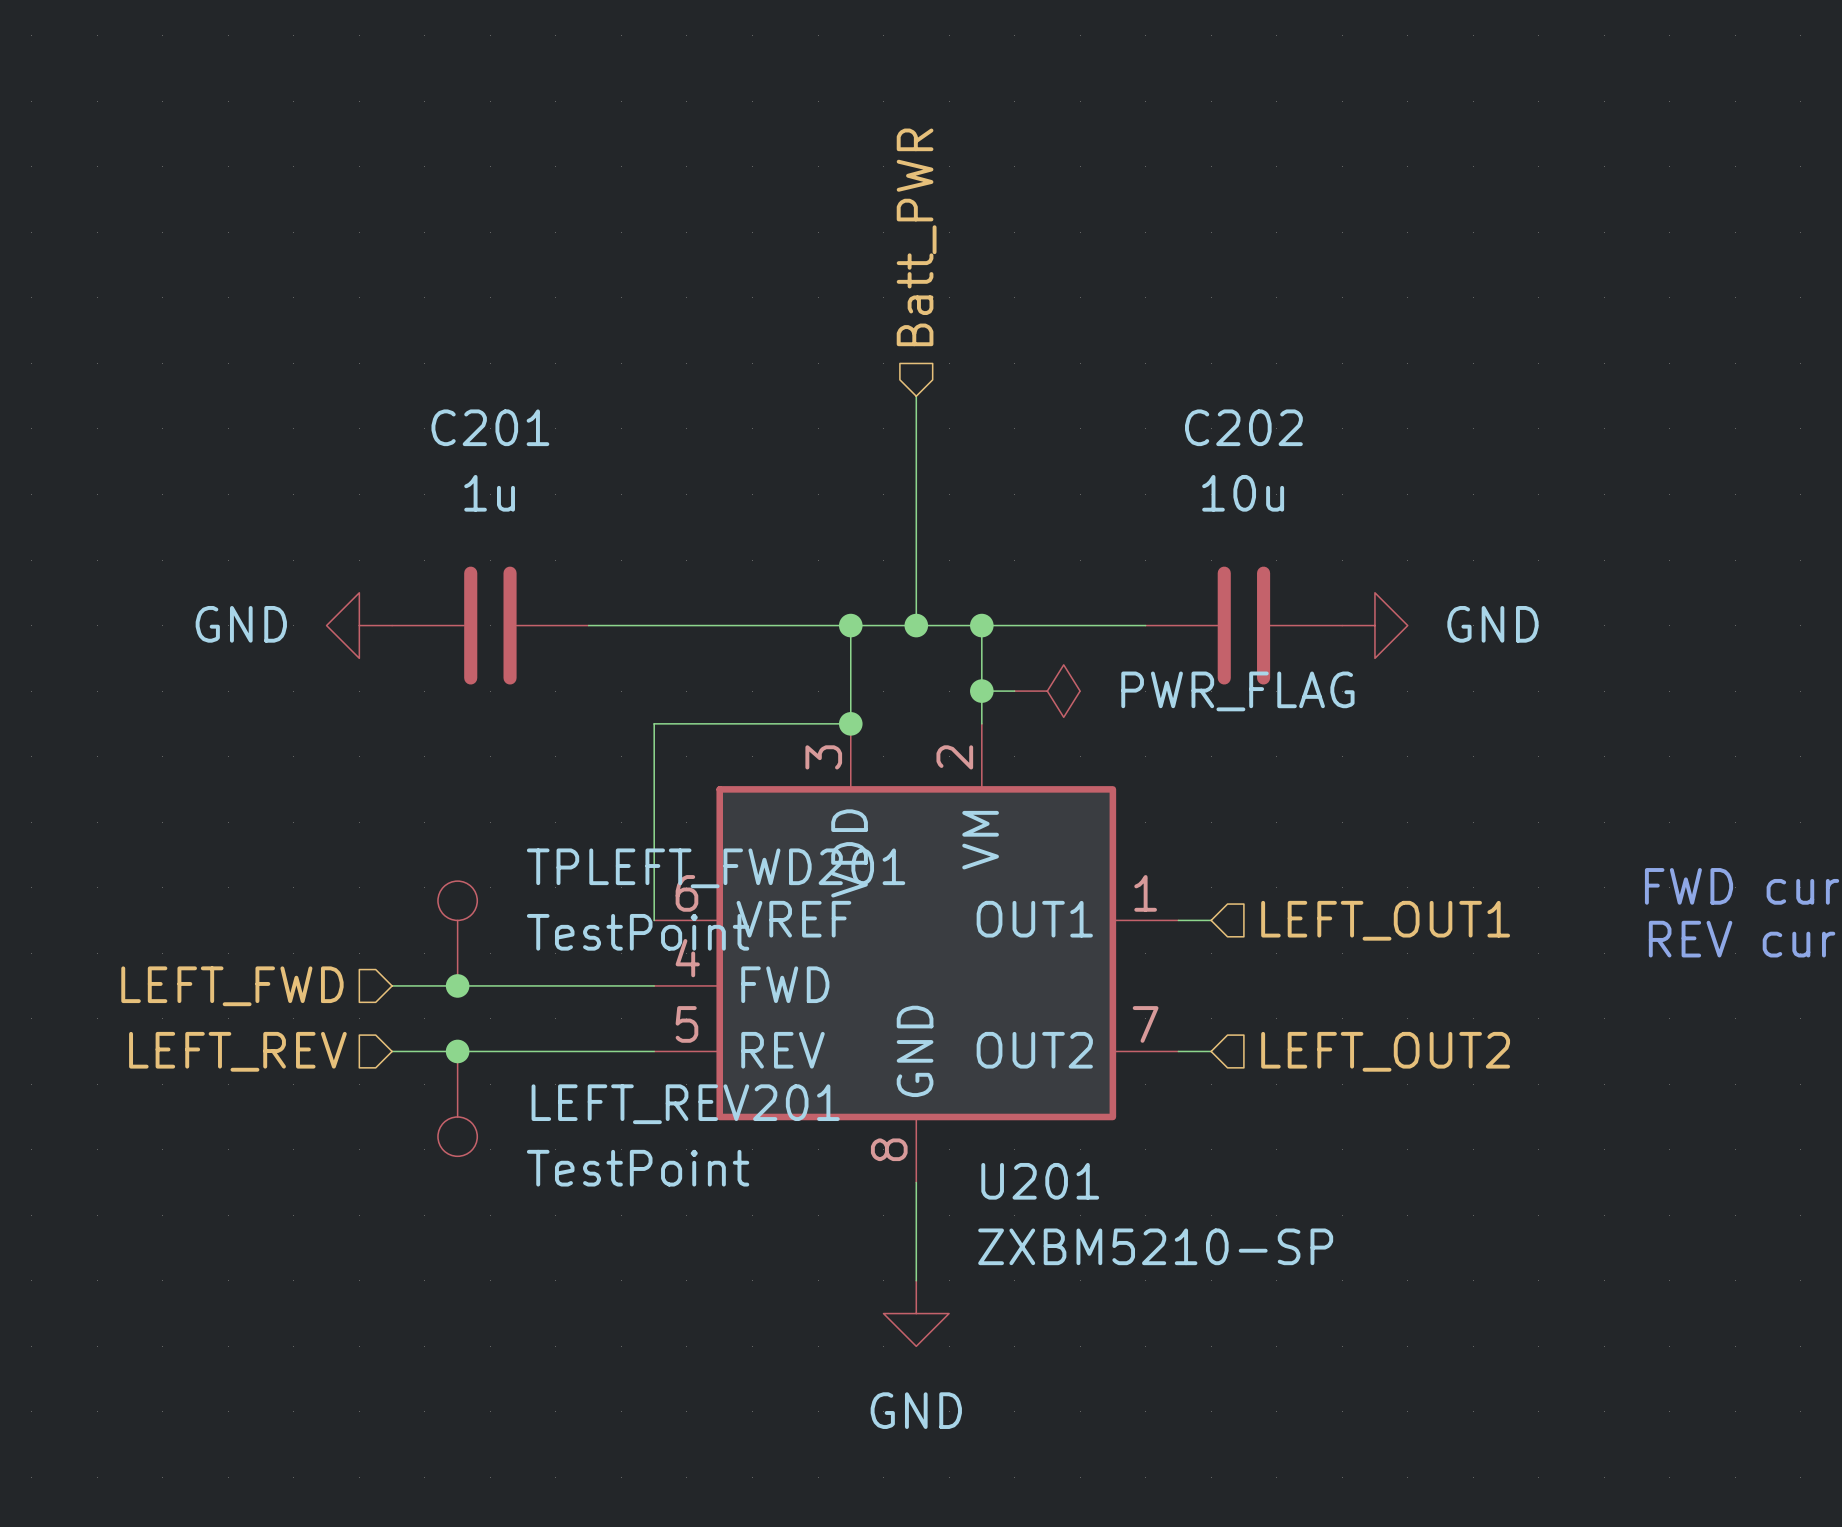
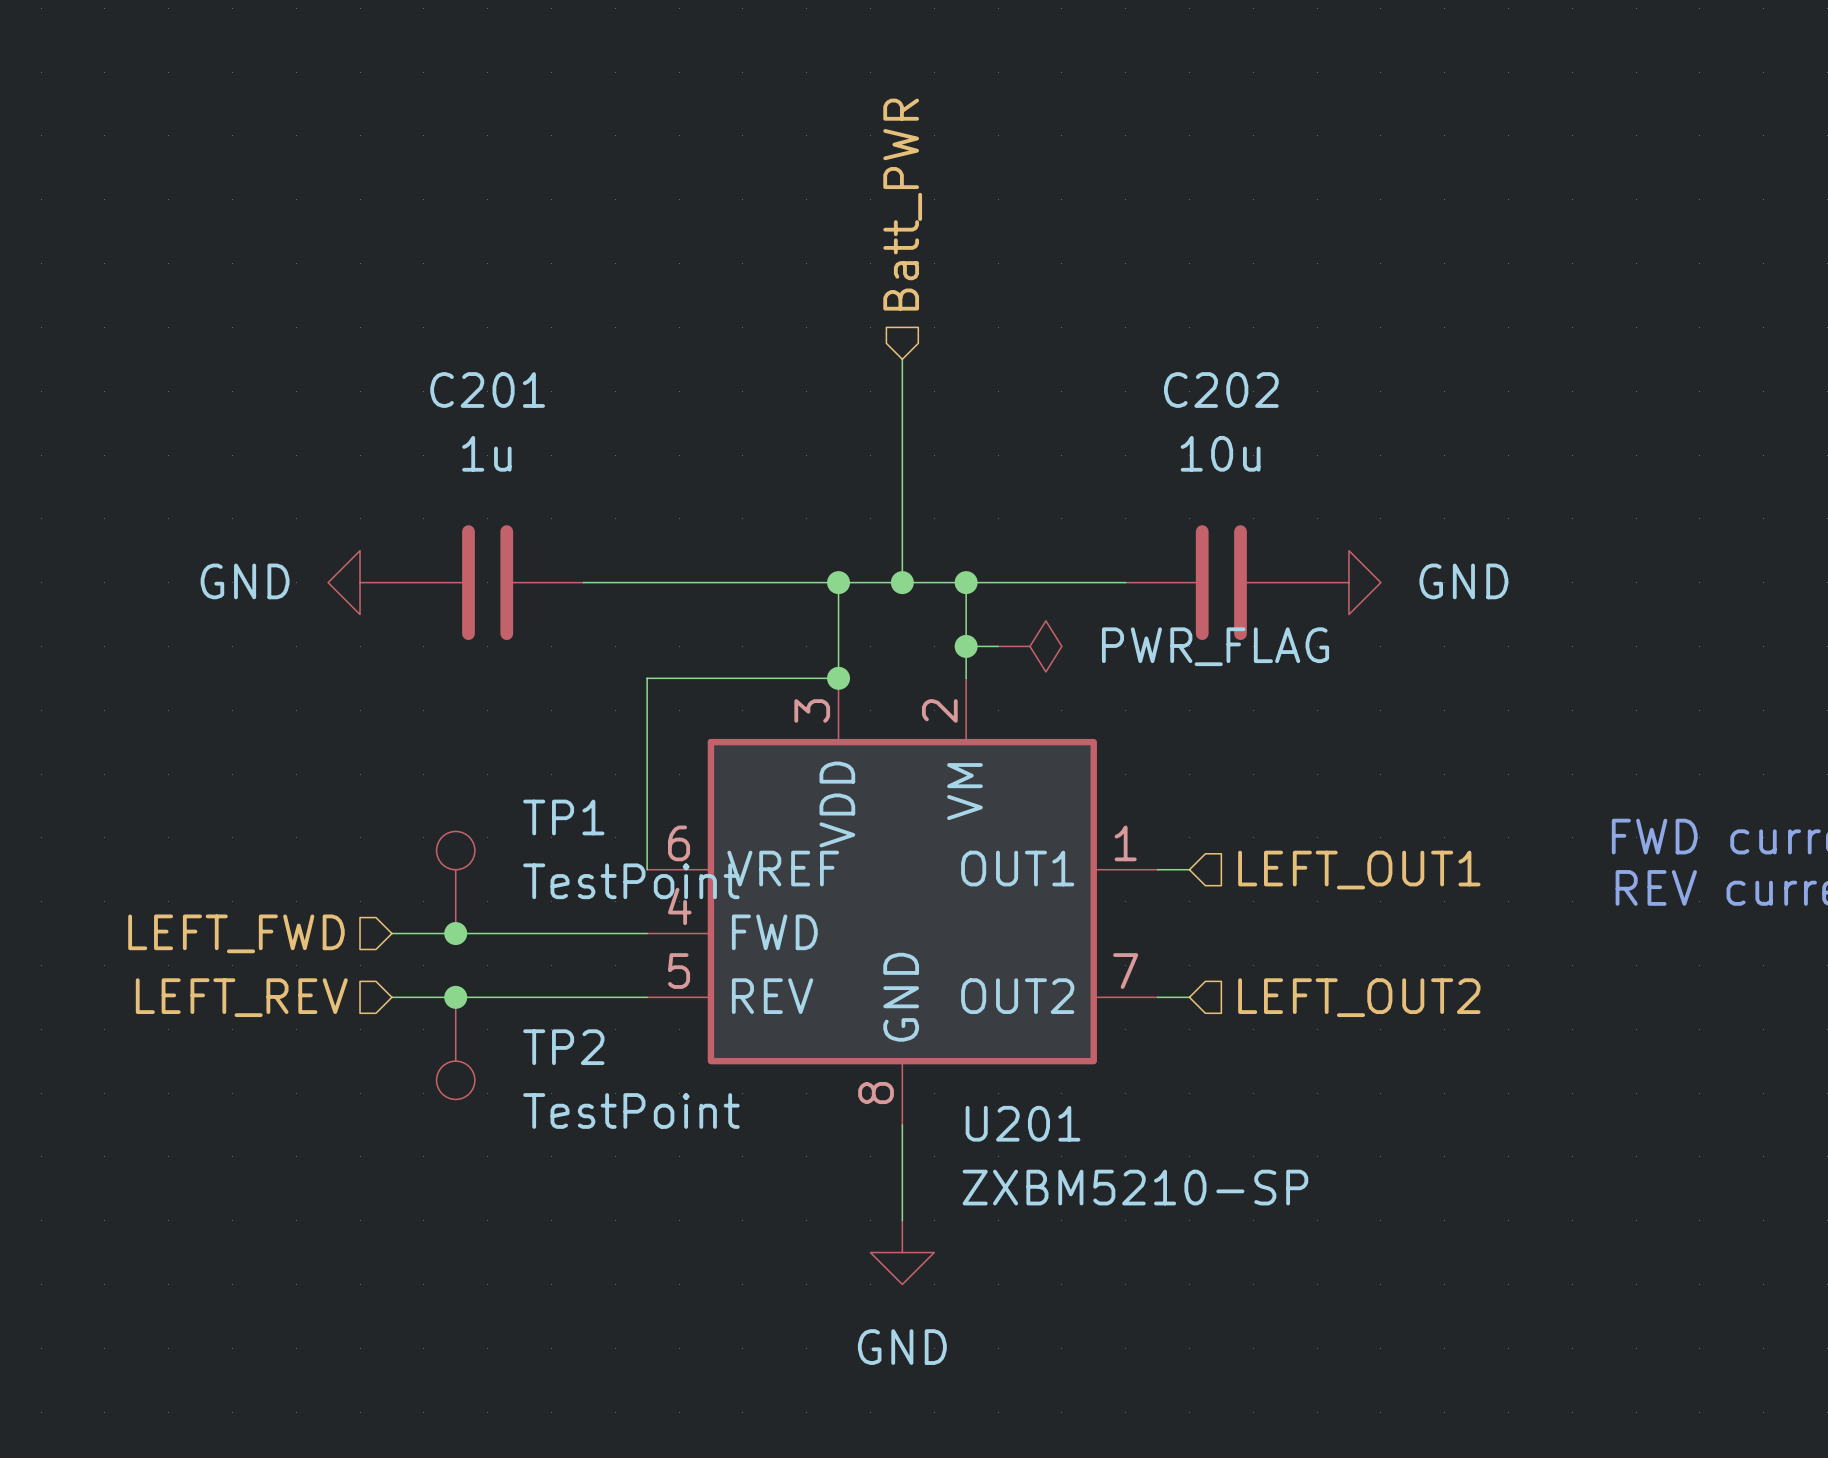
TPLEFT_FWD201 name: TPLEFT_FWD201 (716, 868) -> TP1 (563, 817)
LEFT_REV201 name: LEFT_REV201 (685, 1104) -> TP2 (563, 1047)

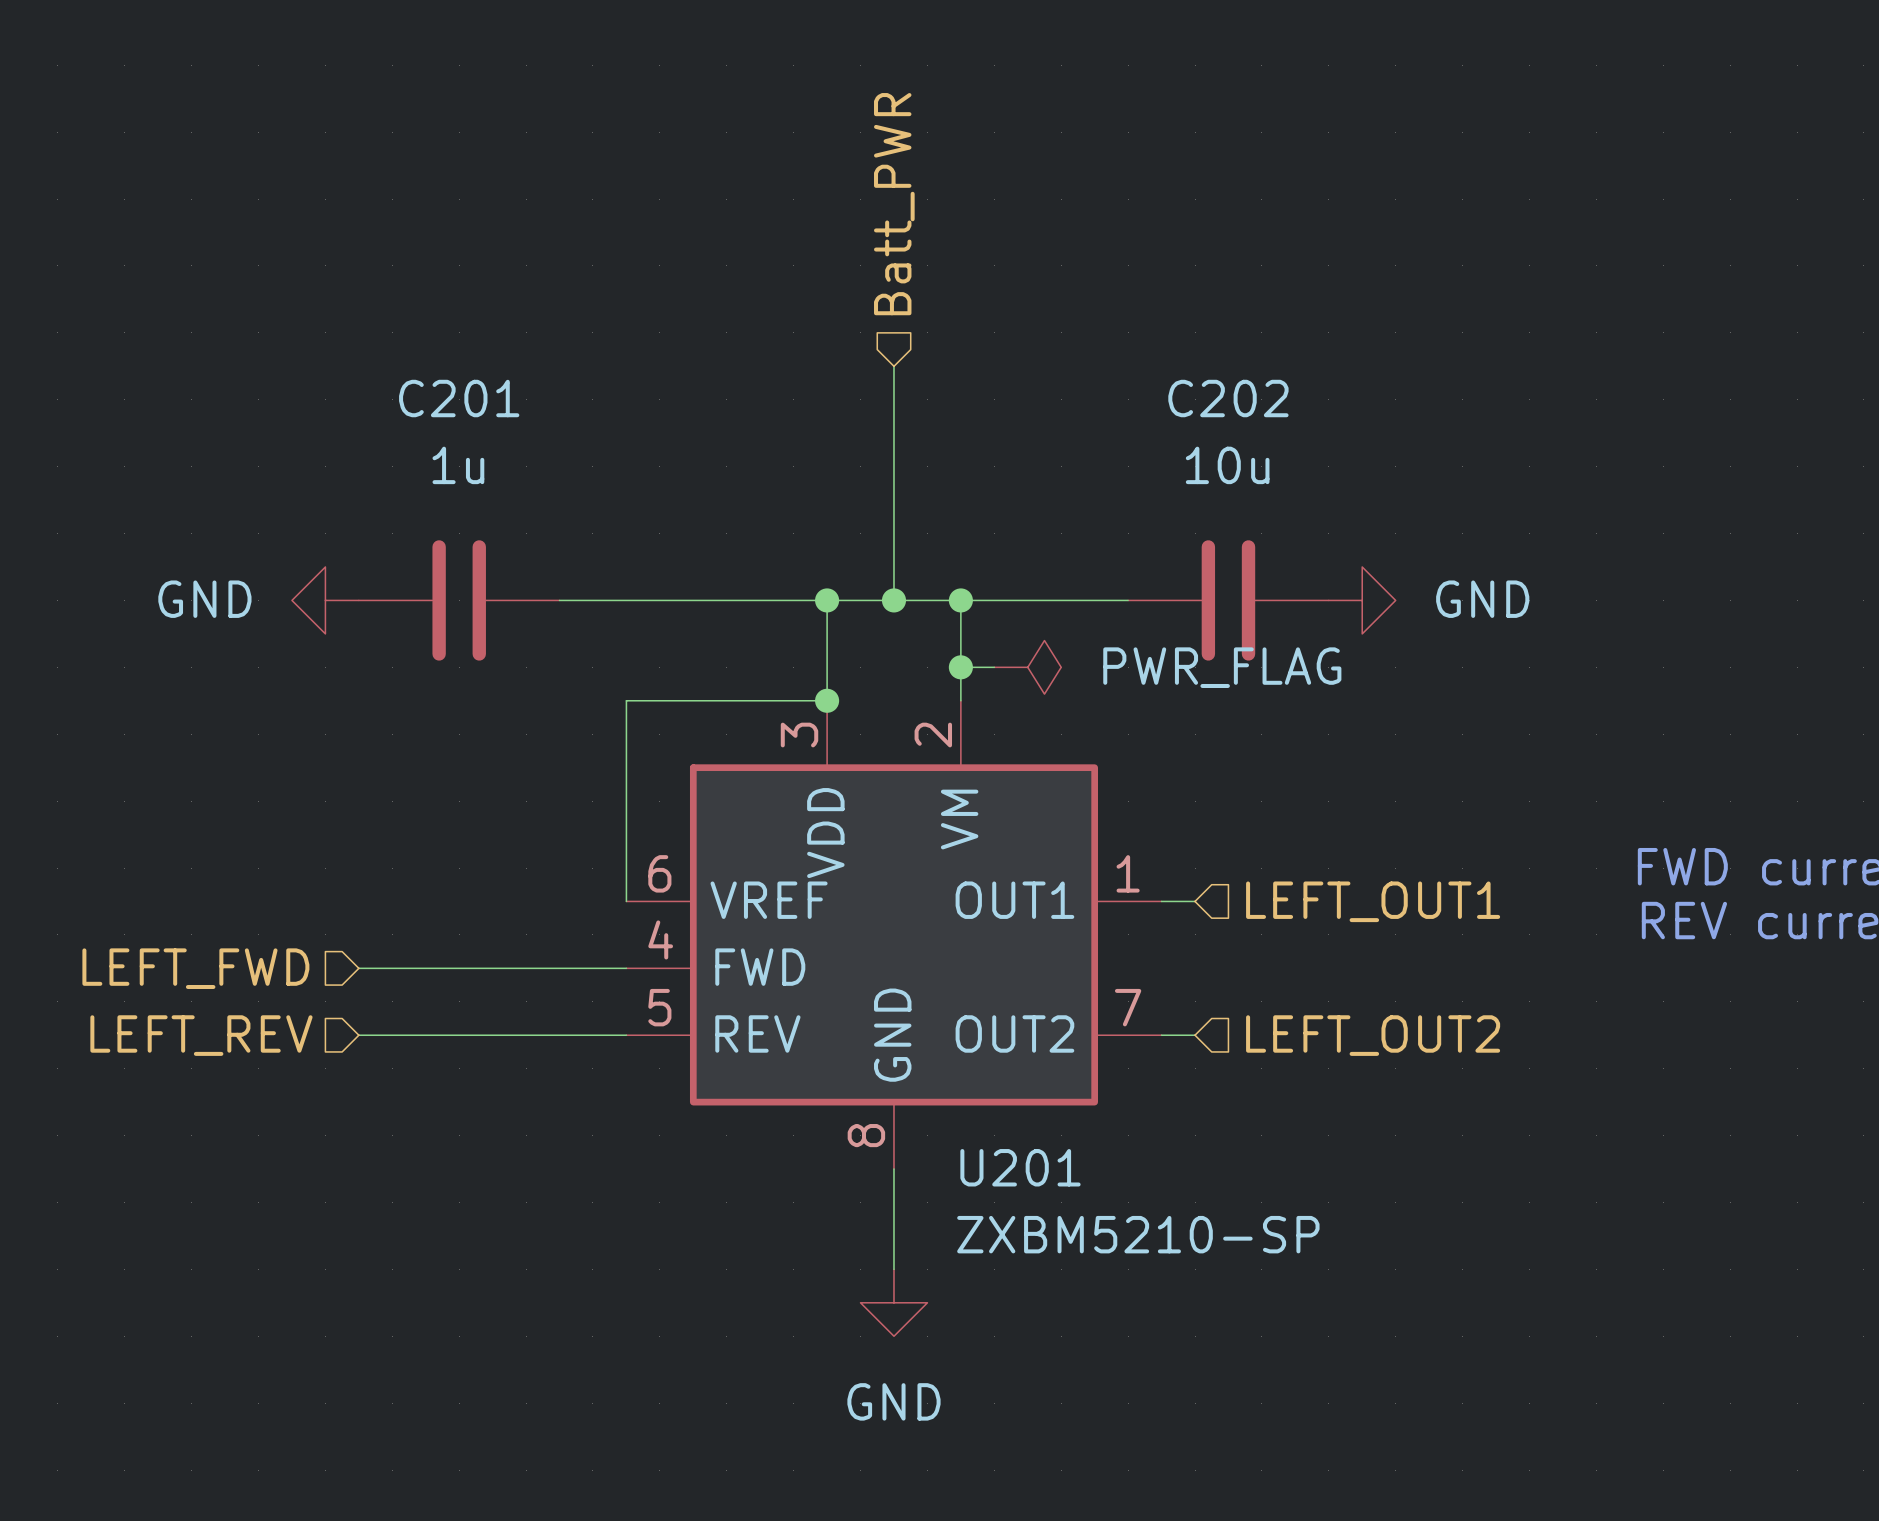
TP1: TestPoint (455, 882) -> none
junction: (455, 933) -> none
junction: (455, 997) -> none
TP2: TestPoint (455, 1048) -> none

